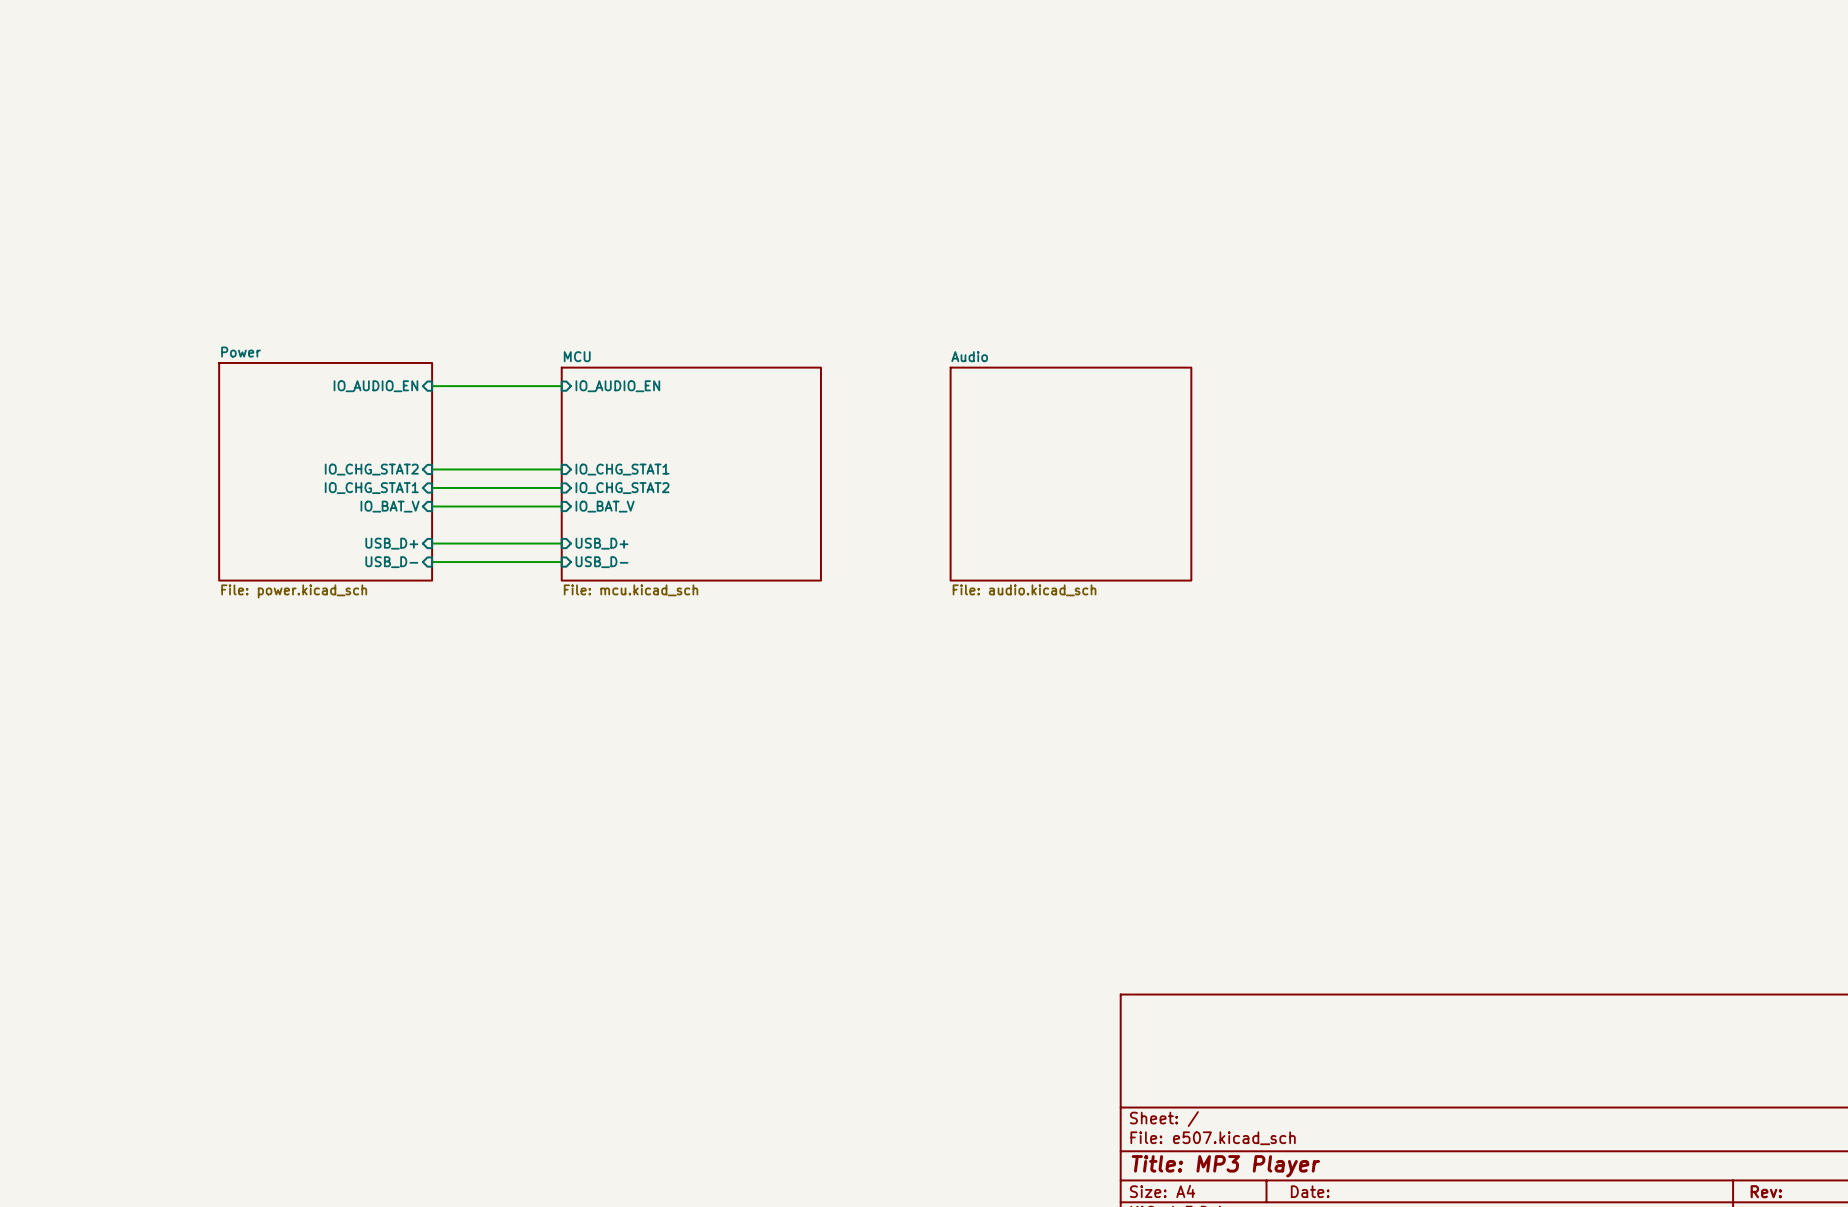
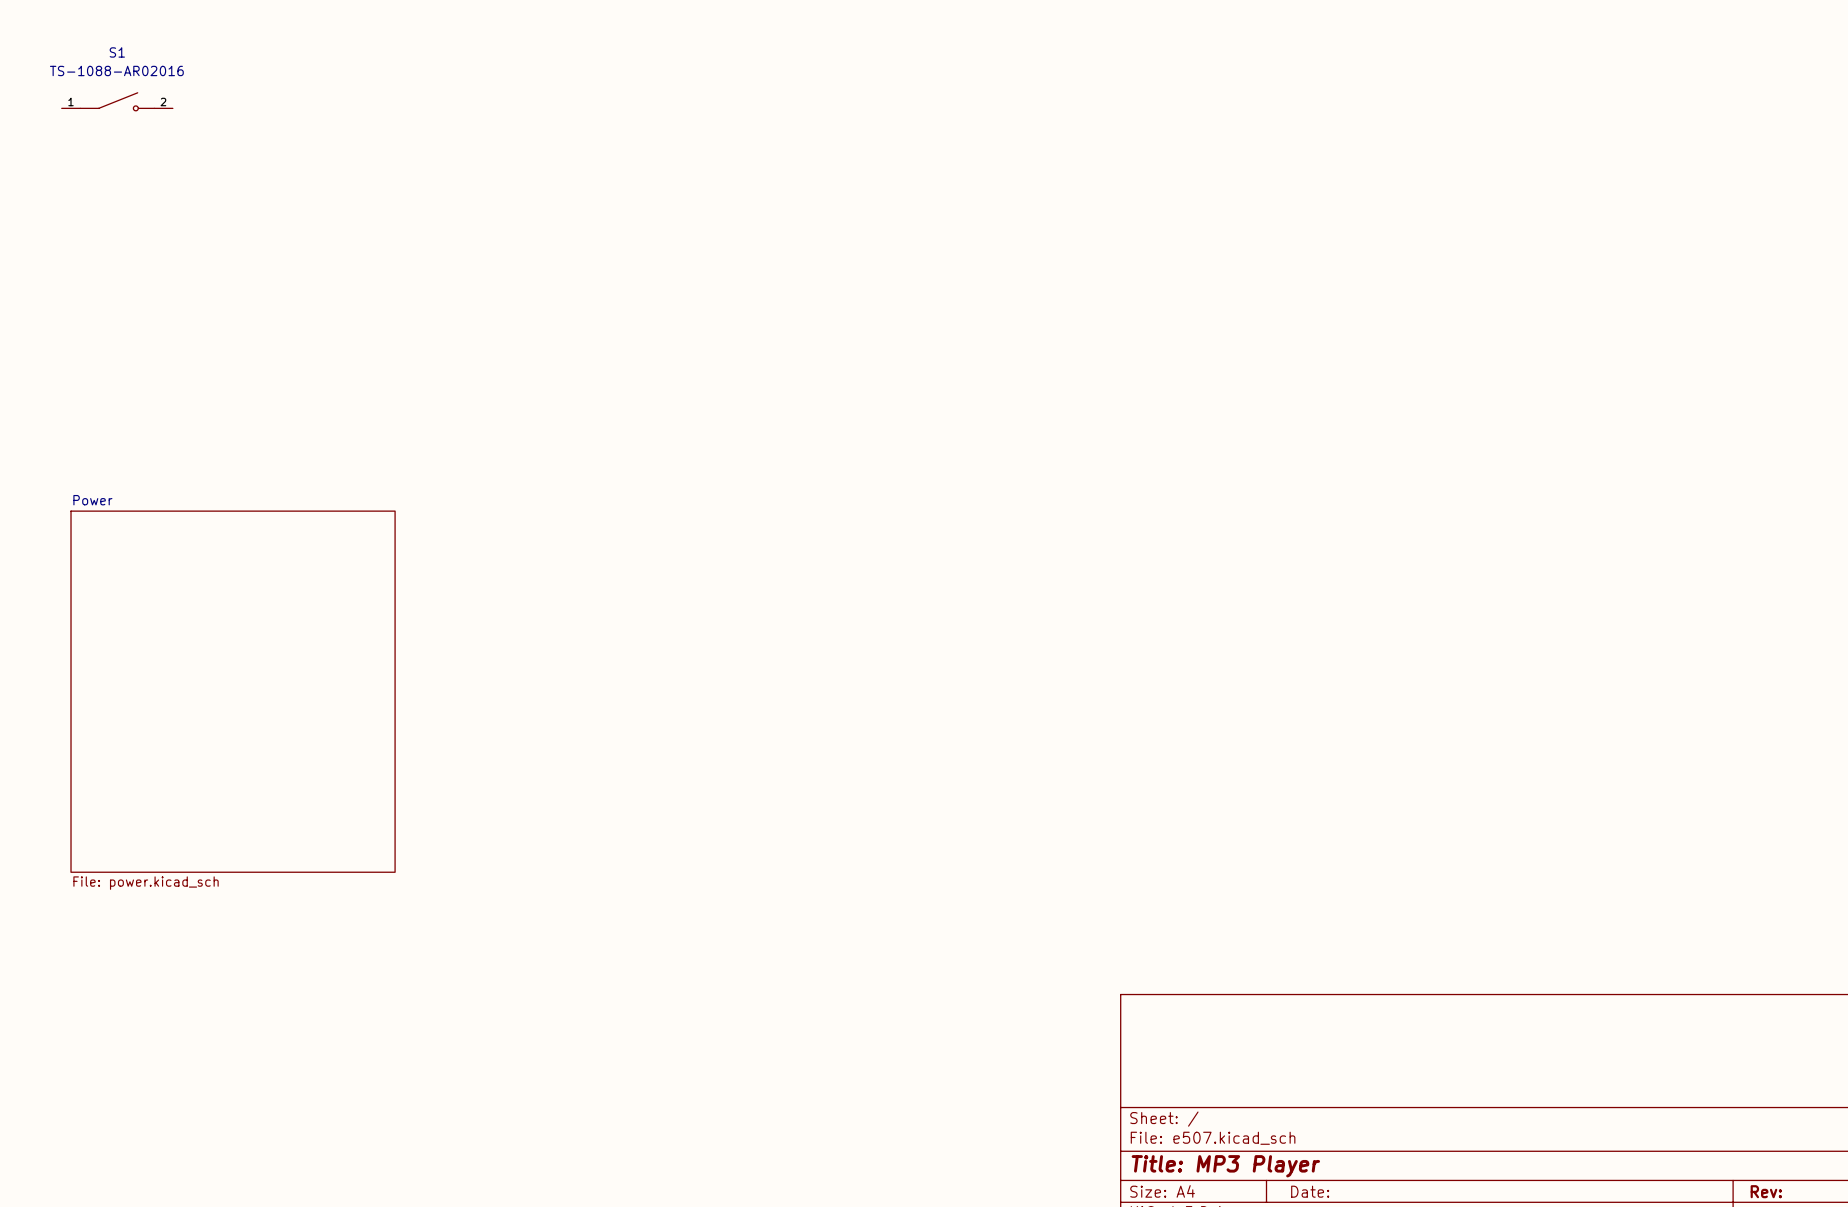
S1: none -> TS-1088-AR02016 (117, 101)
sheet pin: IO_AUDIO_EN (375, 386) -> none
wire: (432, 386) (561, 386) -> none
sheet pin: IO_AUDIO_EN (617, 386) -> none
sheet pin: IO_CHG_STAT2 (371, 469) -> none
wire: (432, 469) (561, 469) -> none
sheet pin: IO_CHG_STAT1 (622, 469) -> none
sheet Power: File: power.kicad_sch (325, 471) -> none
sheet MCU: File: mcu.kicad_sch (691, 474) -> none
sheet Audio: File: audio.kicad_sch (1070, 474) -> none
wire: (432, 487) (561, 487) -> none
sheet pin: IO_CHG_STAT1 (371, 488) -> none
sheet pin: IO_CHG_STAT2 (622, 488) -> none
sheet pin: IO_BAT_V (390, 506) -> none
wire: (432, 506) (561, 506) -> none
sheet pin: IO_BAT_V (605, 506) -> none
sheet pin: USB_D+ (391, 543) -> none
wire: (432, 543) (561, 543) -> none
sheet pin: USB_D+ (601, 543) -> none
sheet pin: USB_D- (391, 562) -> none
wire: (432, 562) (561, 562) -> none
sheet pin: USB_D- (601, 562) -> none
sheet Power: none -> File: power.kicad_sch (233, 691)

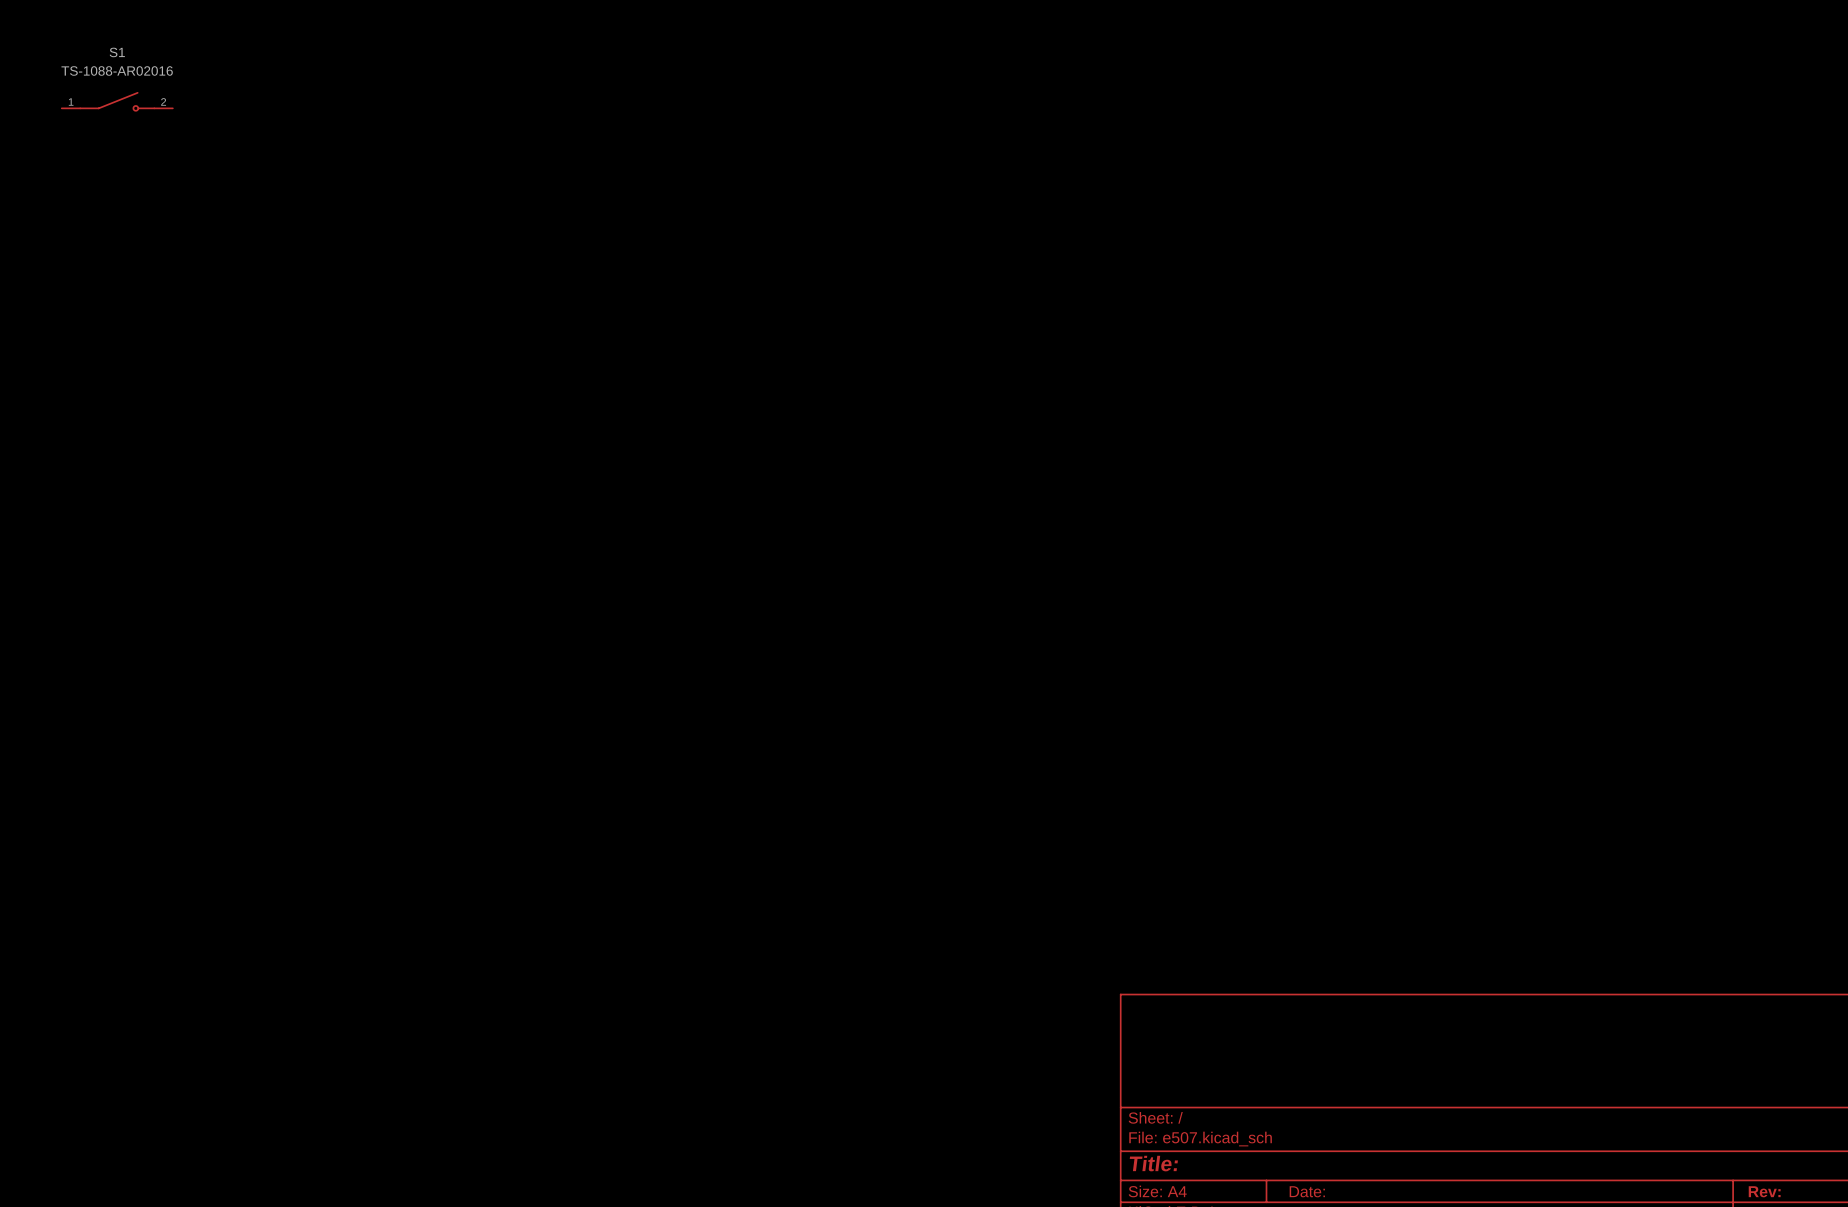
sheet Power: File: power.kicad_sch (233, 691) -> none
title block: Title: MP3 Player (1225, 1166) -> Title: (1153, 1163)

